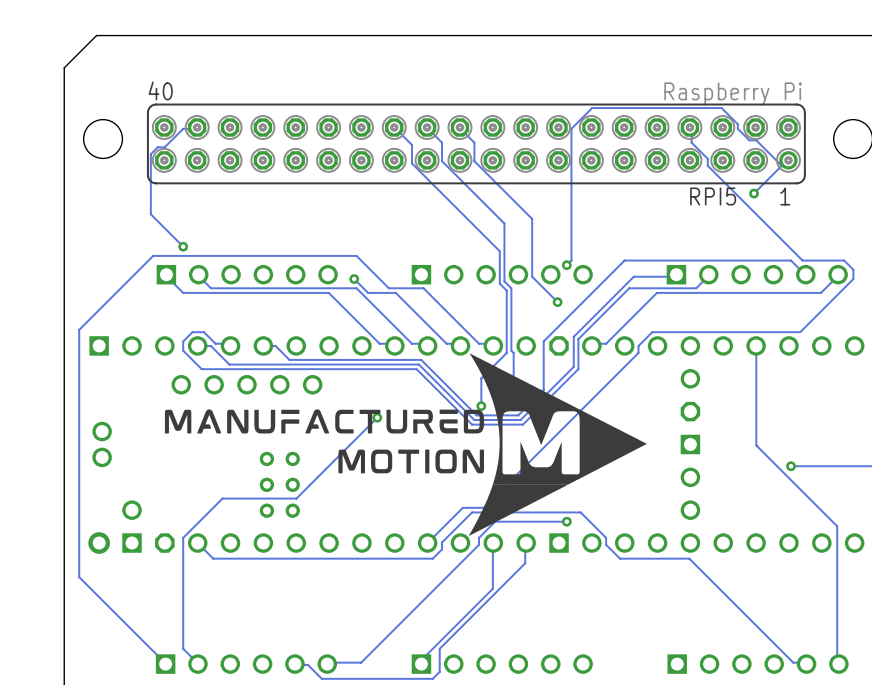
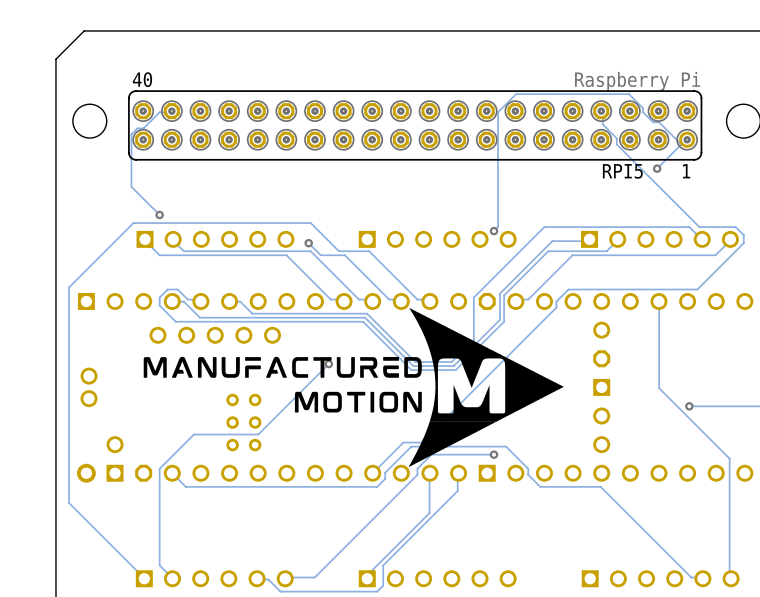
track: (394, 127) (411, 145) (411, 163) (499, 251) (499, 283) (506, 290) (506, 352) (481, 378) (481, 406) -> none
track: (427, 127) (442, 142) (442, 161) (504, 223) (504, 281) (511, 288) (513, 406) -> none
track: (459, 127) (474, 142) (474, 161) (532, 218) (532, 276) (557, 302) -> none
via: (557, 302) -> none
via: (481, 406) -> none

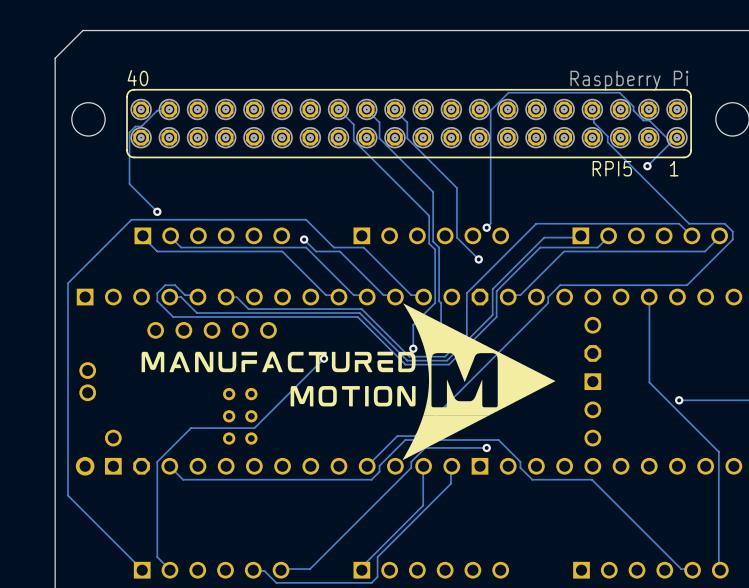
track: none -> (338, 109) (353, 124) (353, 140) (429, 215) (429, 243) (435, 249) (435, 303) (413, 324) (413, 348)
track: none -> (366, 109) (379, 122) (379, 138) (433, 191) (433, 241) (439, 247) (441, 348)
track: none -> (394, 109) (407, 122) (407, 138) (456, 188) (456, 237) (478, 259)
via: none -> (478, 259)
via: none -> (413, 348)

